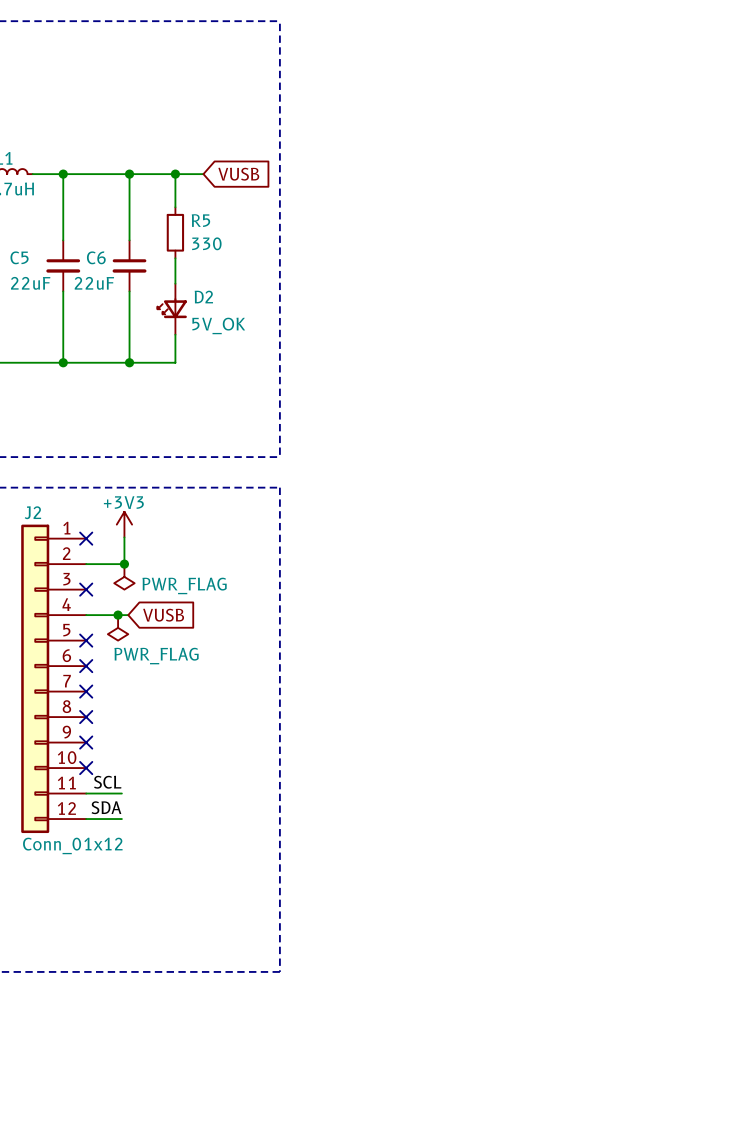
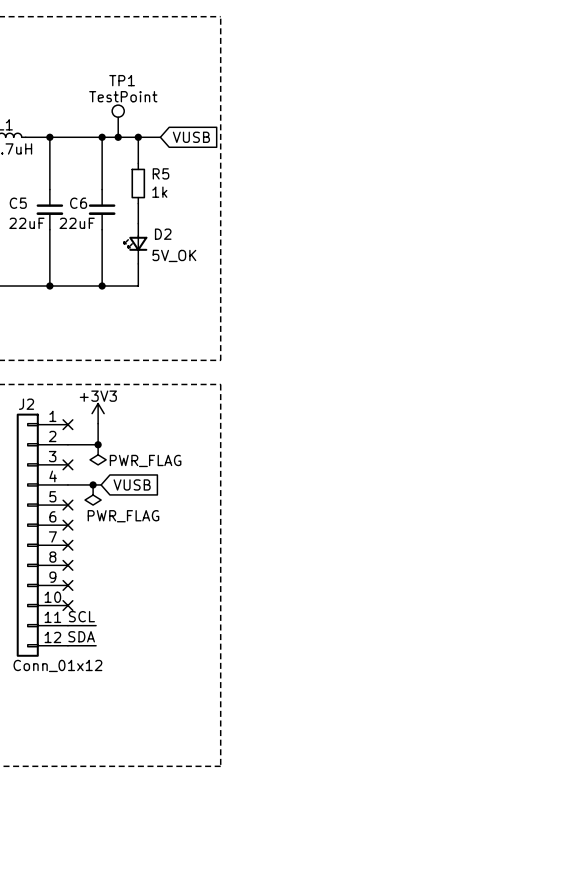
TP1: none -> TestPoint (118, 121)
junction: none -> (118, 137)
R5 value: 330 (206, 243) -> 1k (159, 192)

